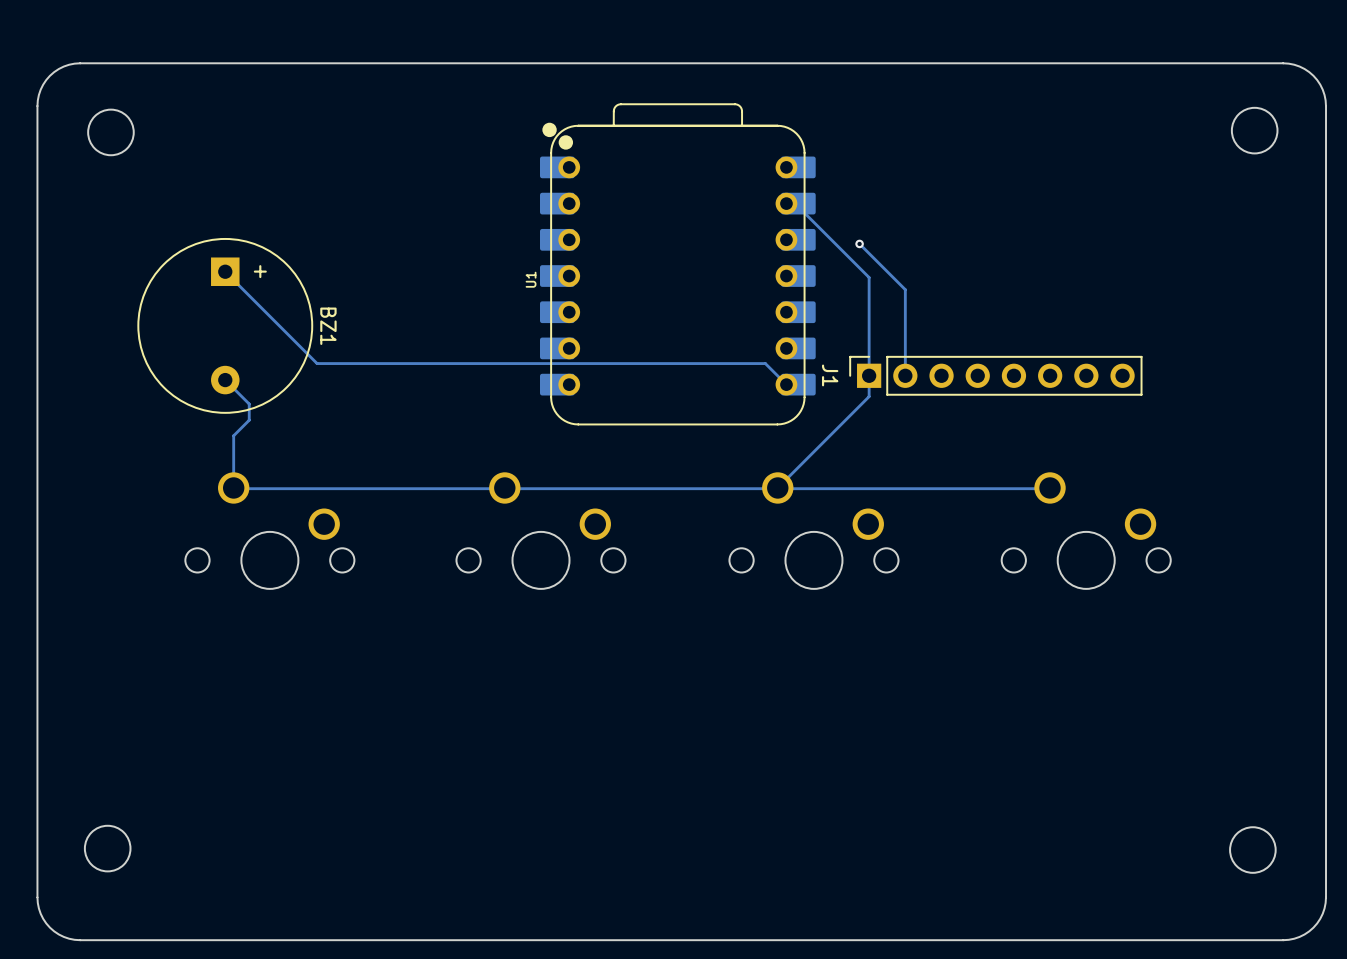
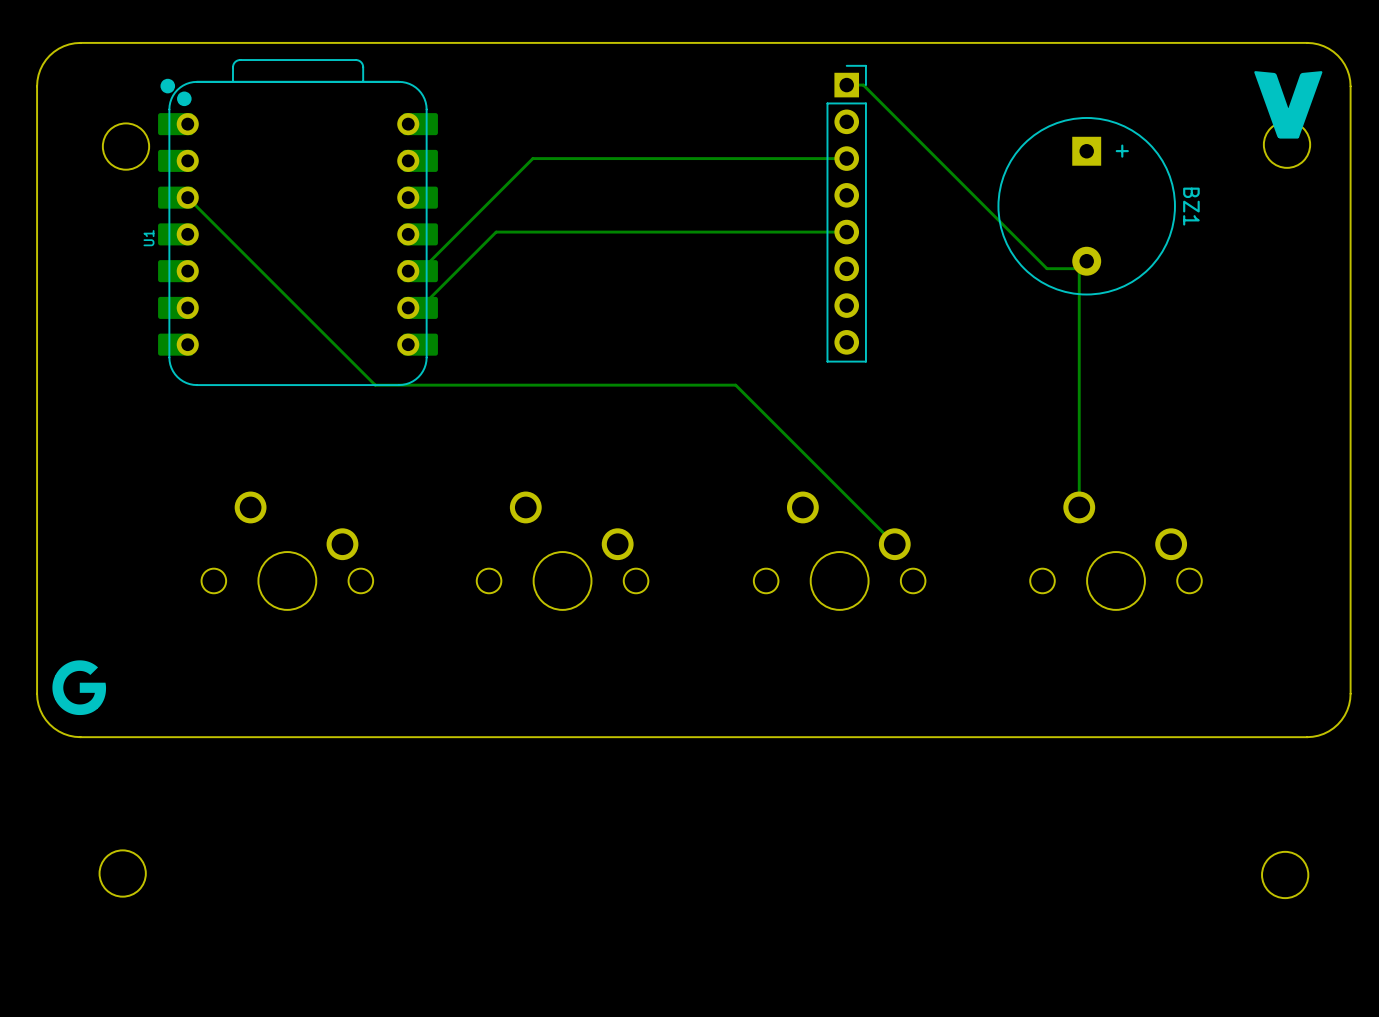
drawing: none -> [1254, 71, 1323, 139]
board edge: (1283, 63) (80, 63) (63, 66) (54, 72) (43, 84) (37, 106) (37, 897) (38, 908) (46, 923) (58, 934) (80, 940) (1283, 940) (1294, 938) (1309, 931) (1322, 913) (1326, 897) (1326, 106) (1322, 89) (1313, 75) (1299, 66) (1283, 63) -> (1307, 42) (1323, 46) (1337, 55) (1347, 69) (1350, 86) (1350, 693) (1344, 715) (1328, 731) (1307, 737) (80, 737) (58, 731) (42, 715) (37, 693) (37, 86) (42, 64) (58, 48) (80, 42) (1307, 42)
track: none -> (846, 85) (863, 85) (1046, 268) (1079, 268)
track: none -> (846, 158) (532, 158) (420, 271) (408, 271)
track: none -> (175, 197) (187, 197) (375, 385) (735, 385) (894, 544)
part: none -> (846, 213)
track: (786, 203) (795, 203) (869, 277) (869, 396) (777, 488) -> none
track: none -> (846, 232) (496, 232) (420, 307) (408, 307)
track: (859, 243) (905, 289) (905, 375) -> none
via: (859, 243) -> none
track: none -> (1079, 268) (1079, 507)
U1 position: (677, 264) -> (298, 222)
track: (225, 271) (317, 363) (765, 363) (786, 384) -> none
BZ1 position: (225, 325) -> (1086, 206)
J1: (995, 375) -> none
track: (225, 380) (249, 404) (249, 420) (233, 435) (233, 487) -> none
track: (1047, 488) (235, 488) -> none
drawing: none -> [52, 660, 107, 716]

